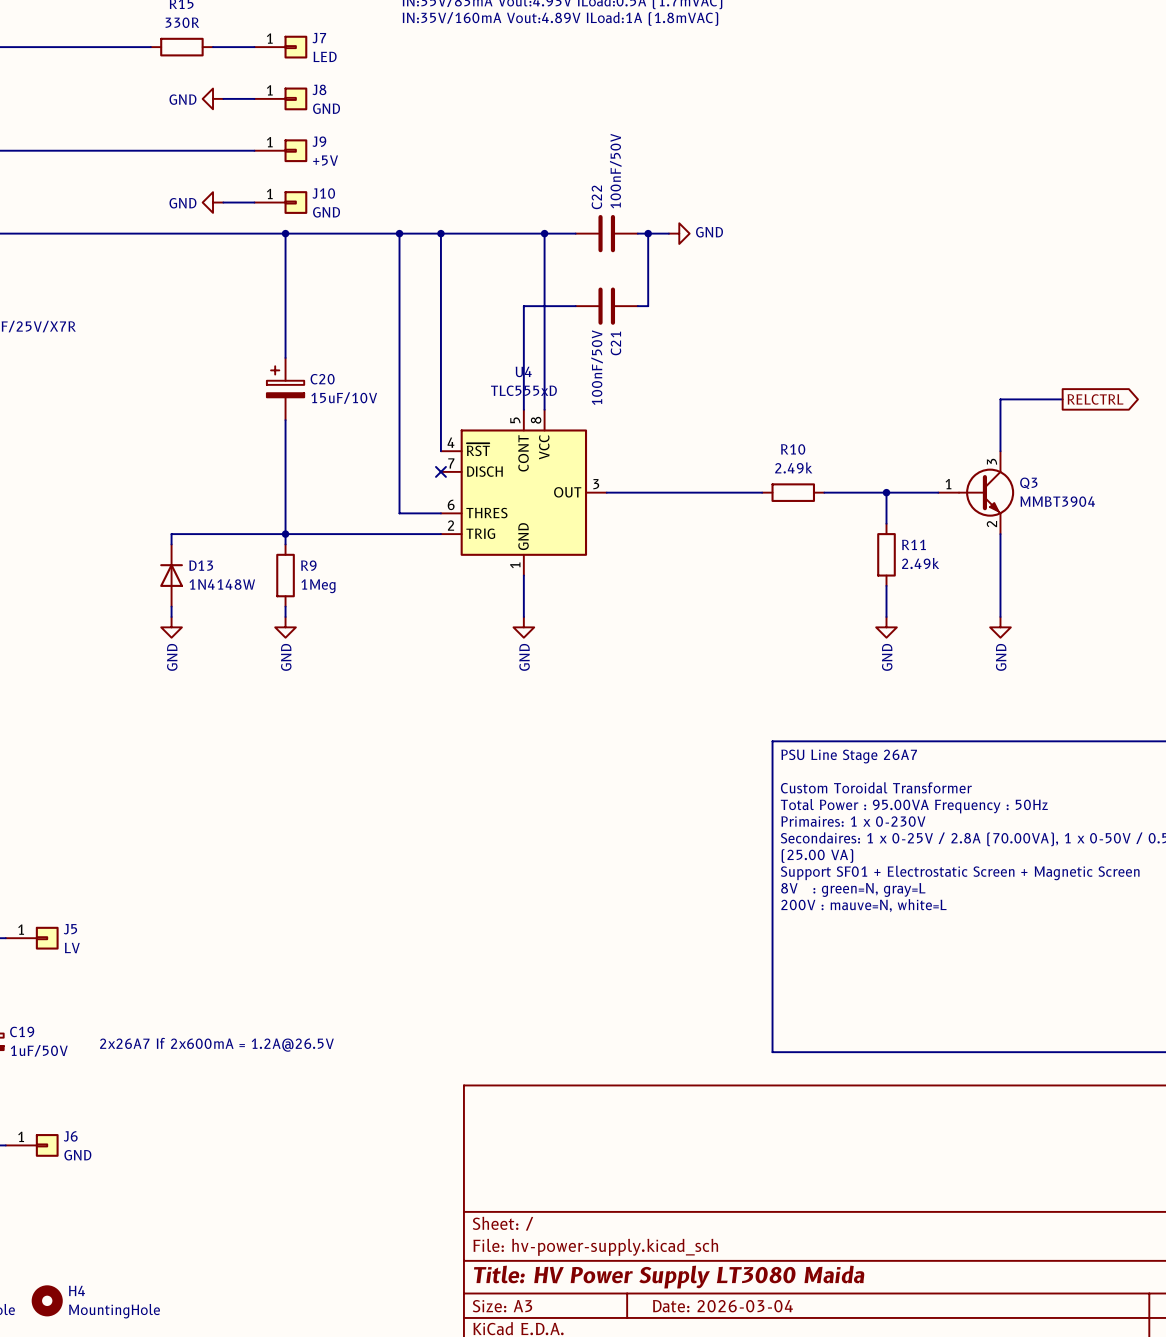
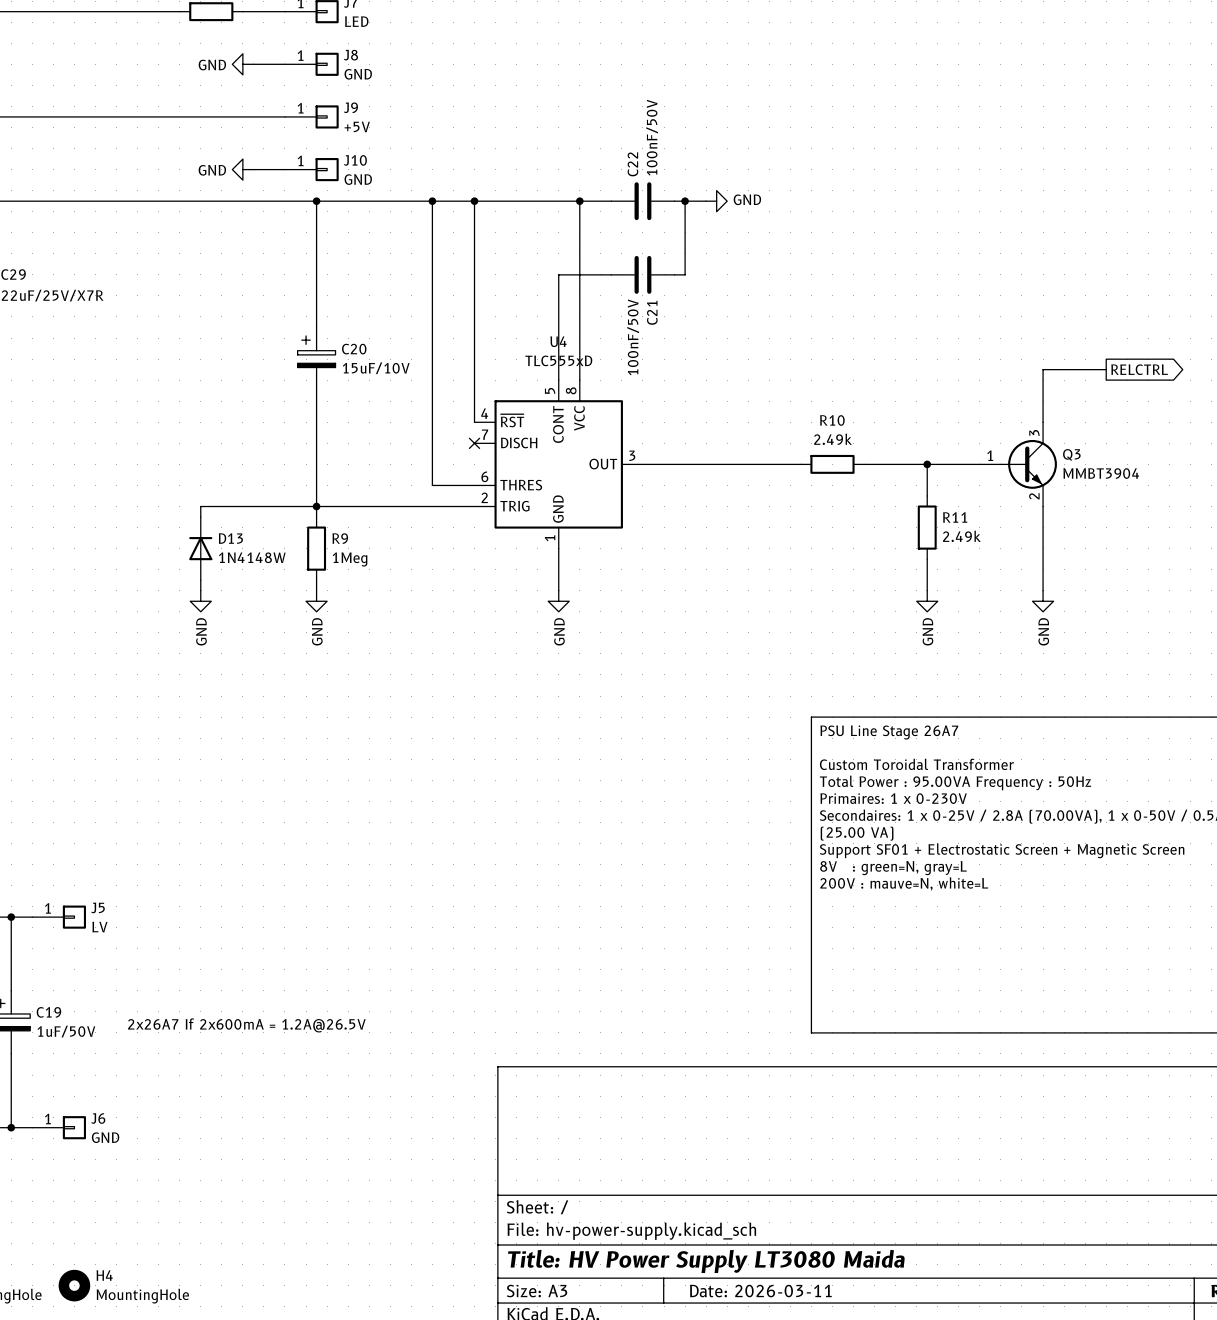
title block: Date: 2026-03-04 (722, 1306) -> Date: 2026-03-11 (760, 1291)

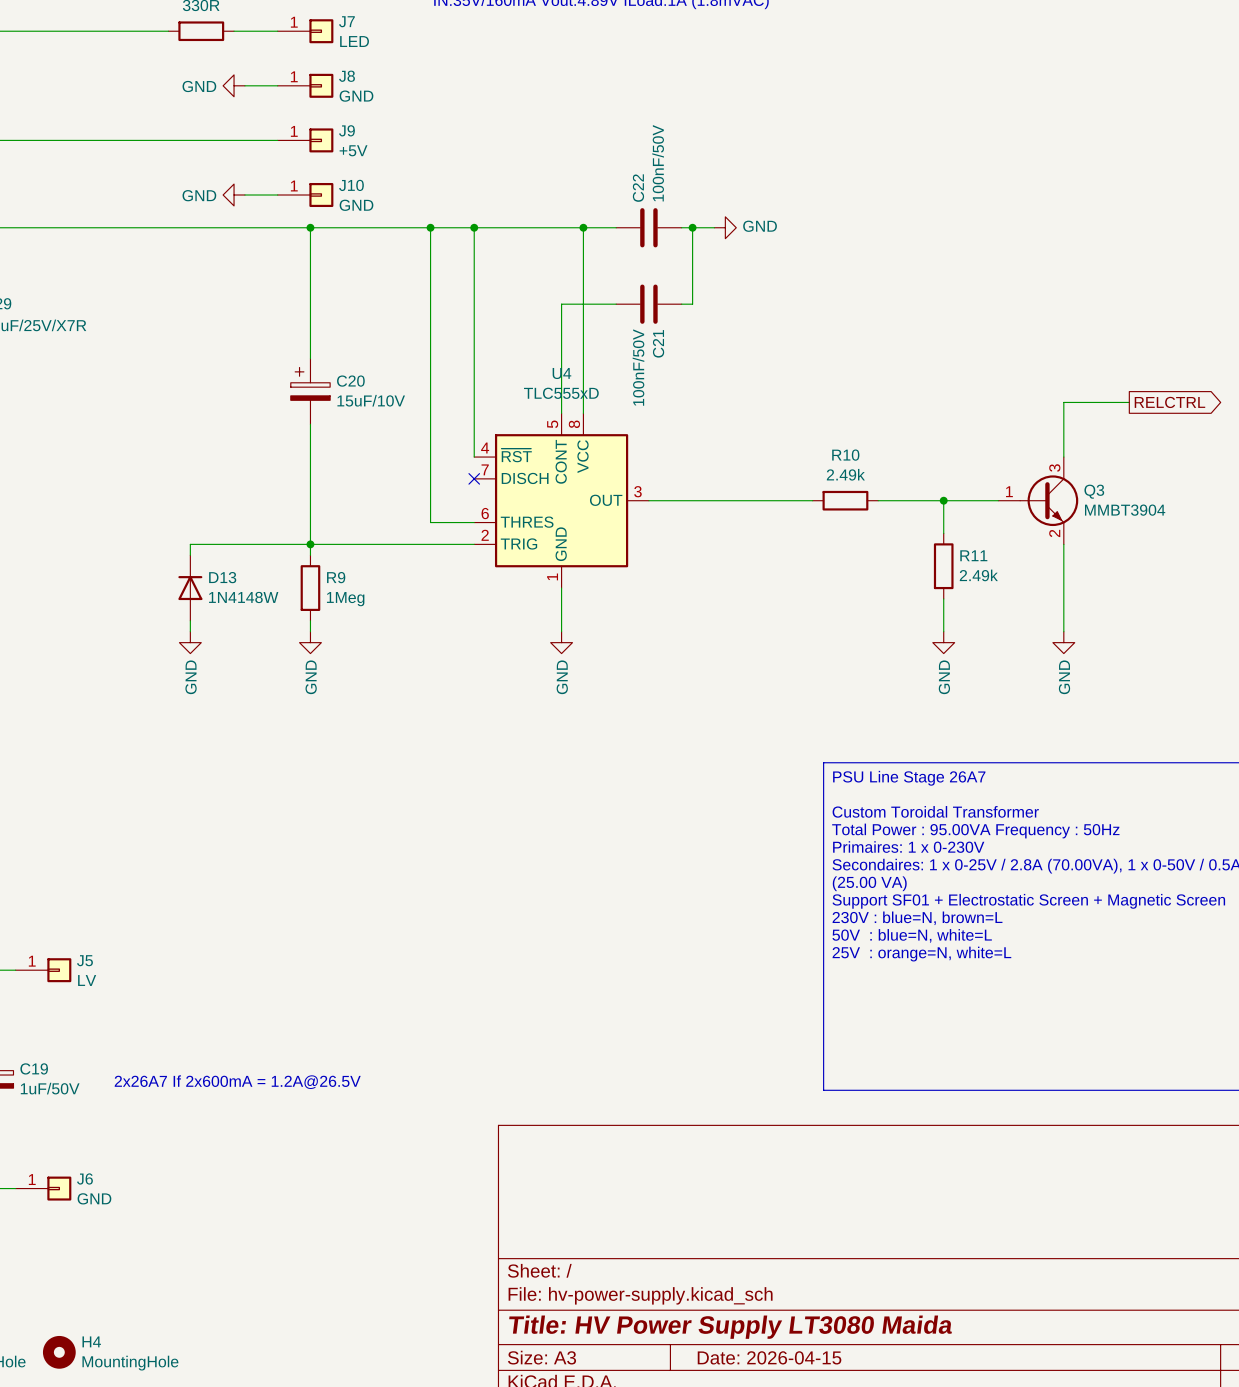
text: 8V : green=N, gray=L (893, 868) -> 230V : blue=N, brown=L (917, 918)
text: 200V : mauve=N, white=L (904, 883) -> 50V : blue=N, white=L (912, 935)
text: none -> 25V : orange=N, white=L (921, 954)
title block: Date: 2026-03-11 (760, 1291) -> Date: 2026-04-15 (769, 1357)

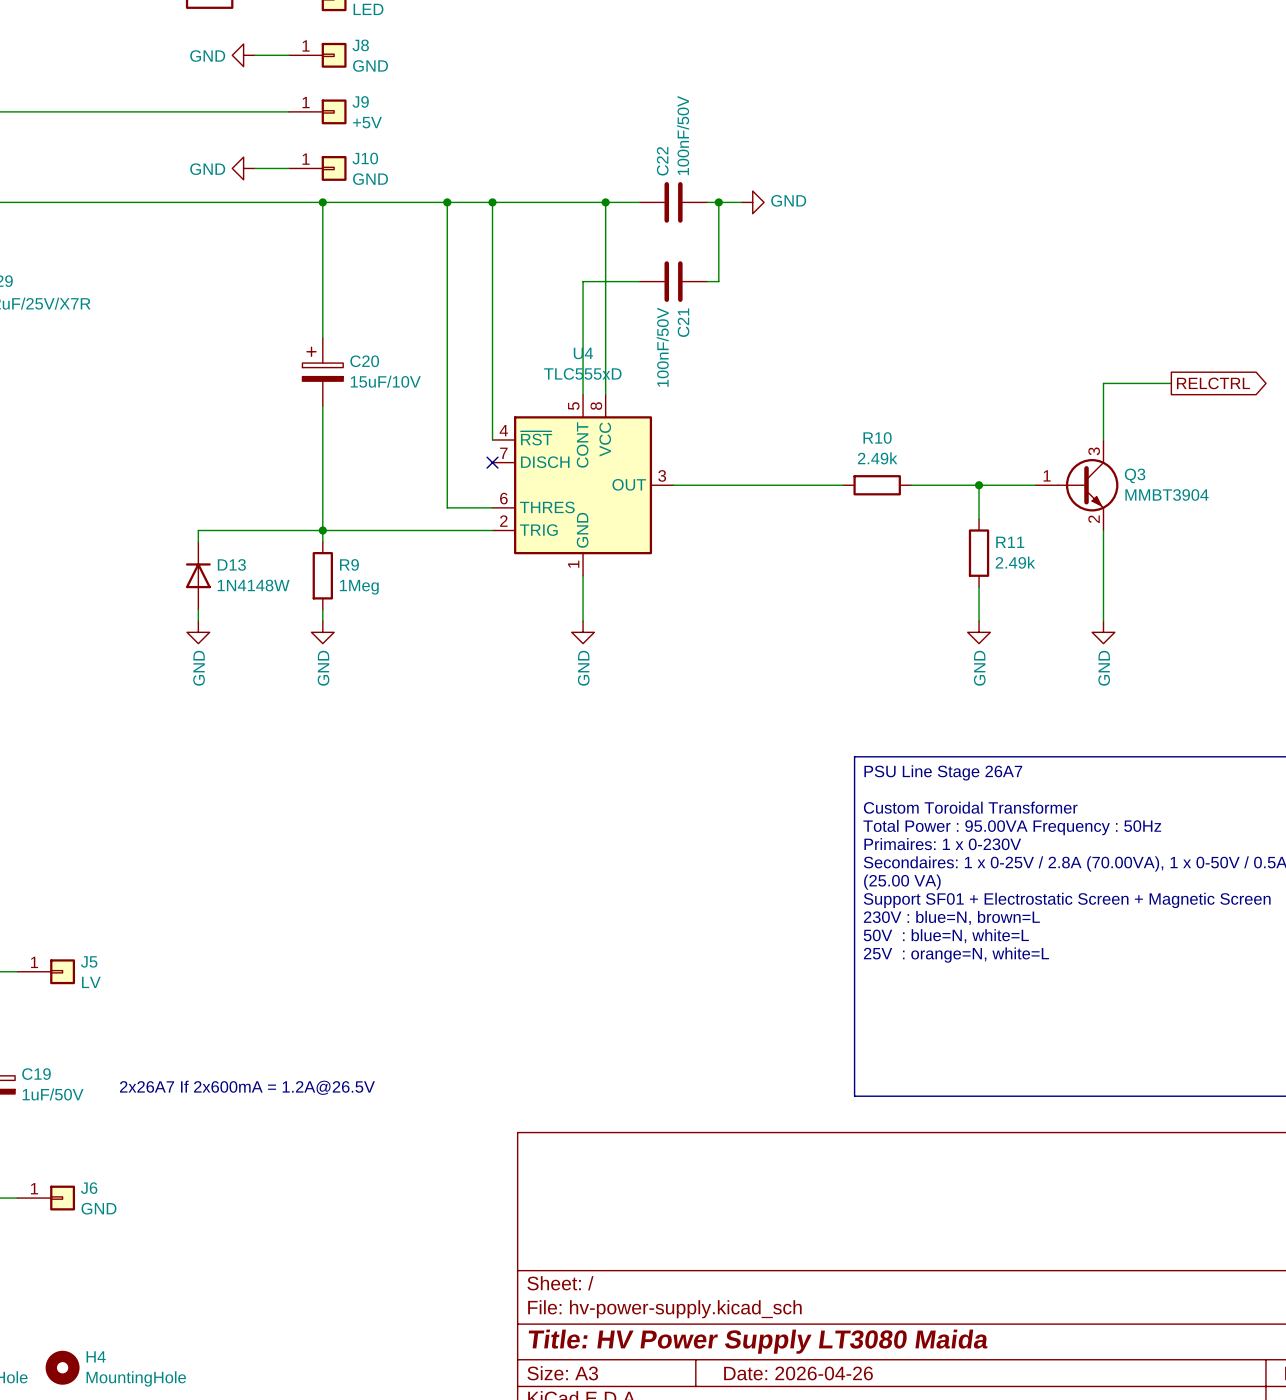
title block: Date: 2026-04-15 (769, 1357) -> Date: 2026-04-26 (798, 1373)

